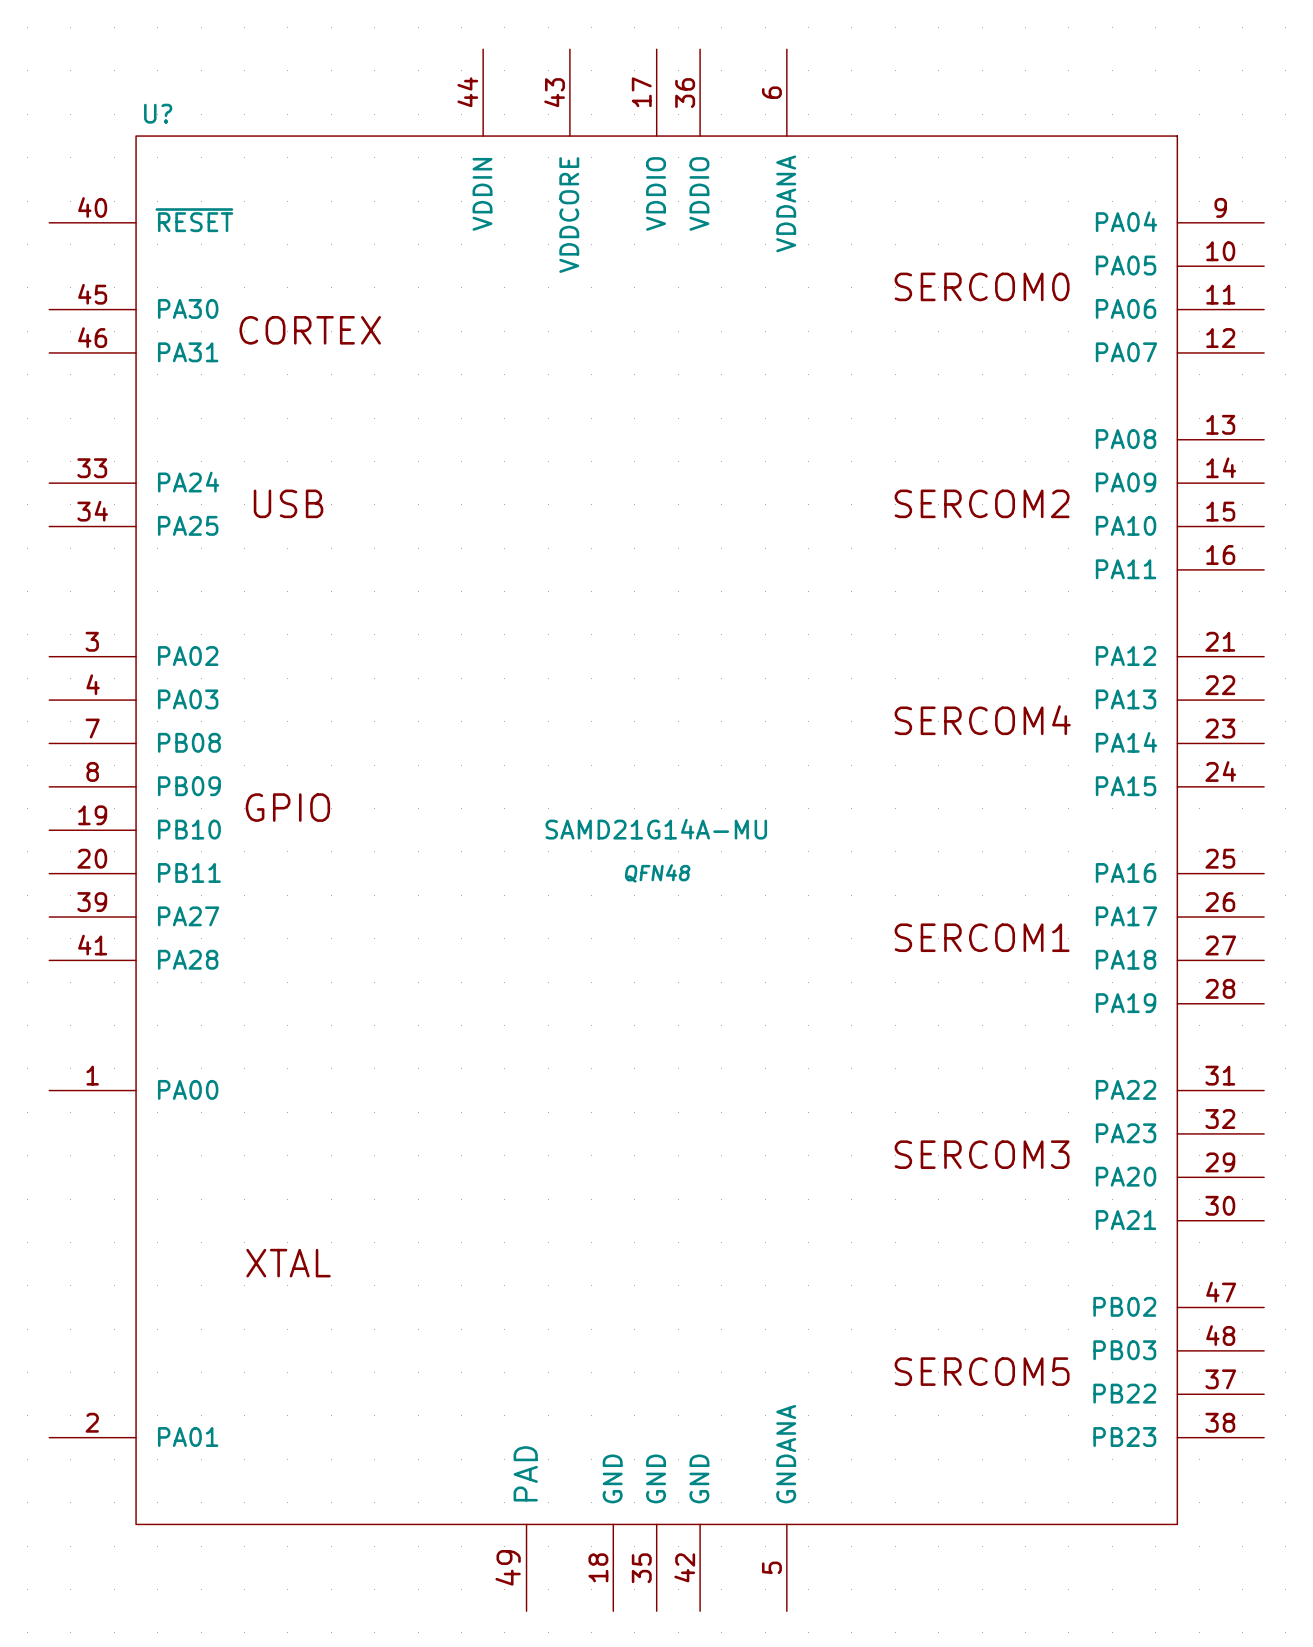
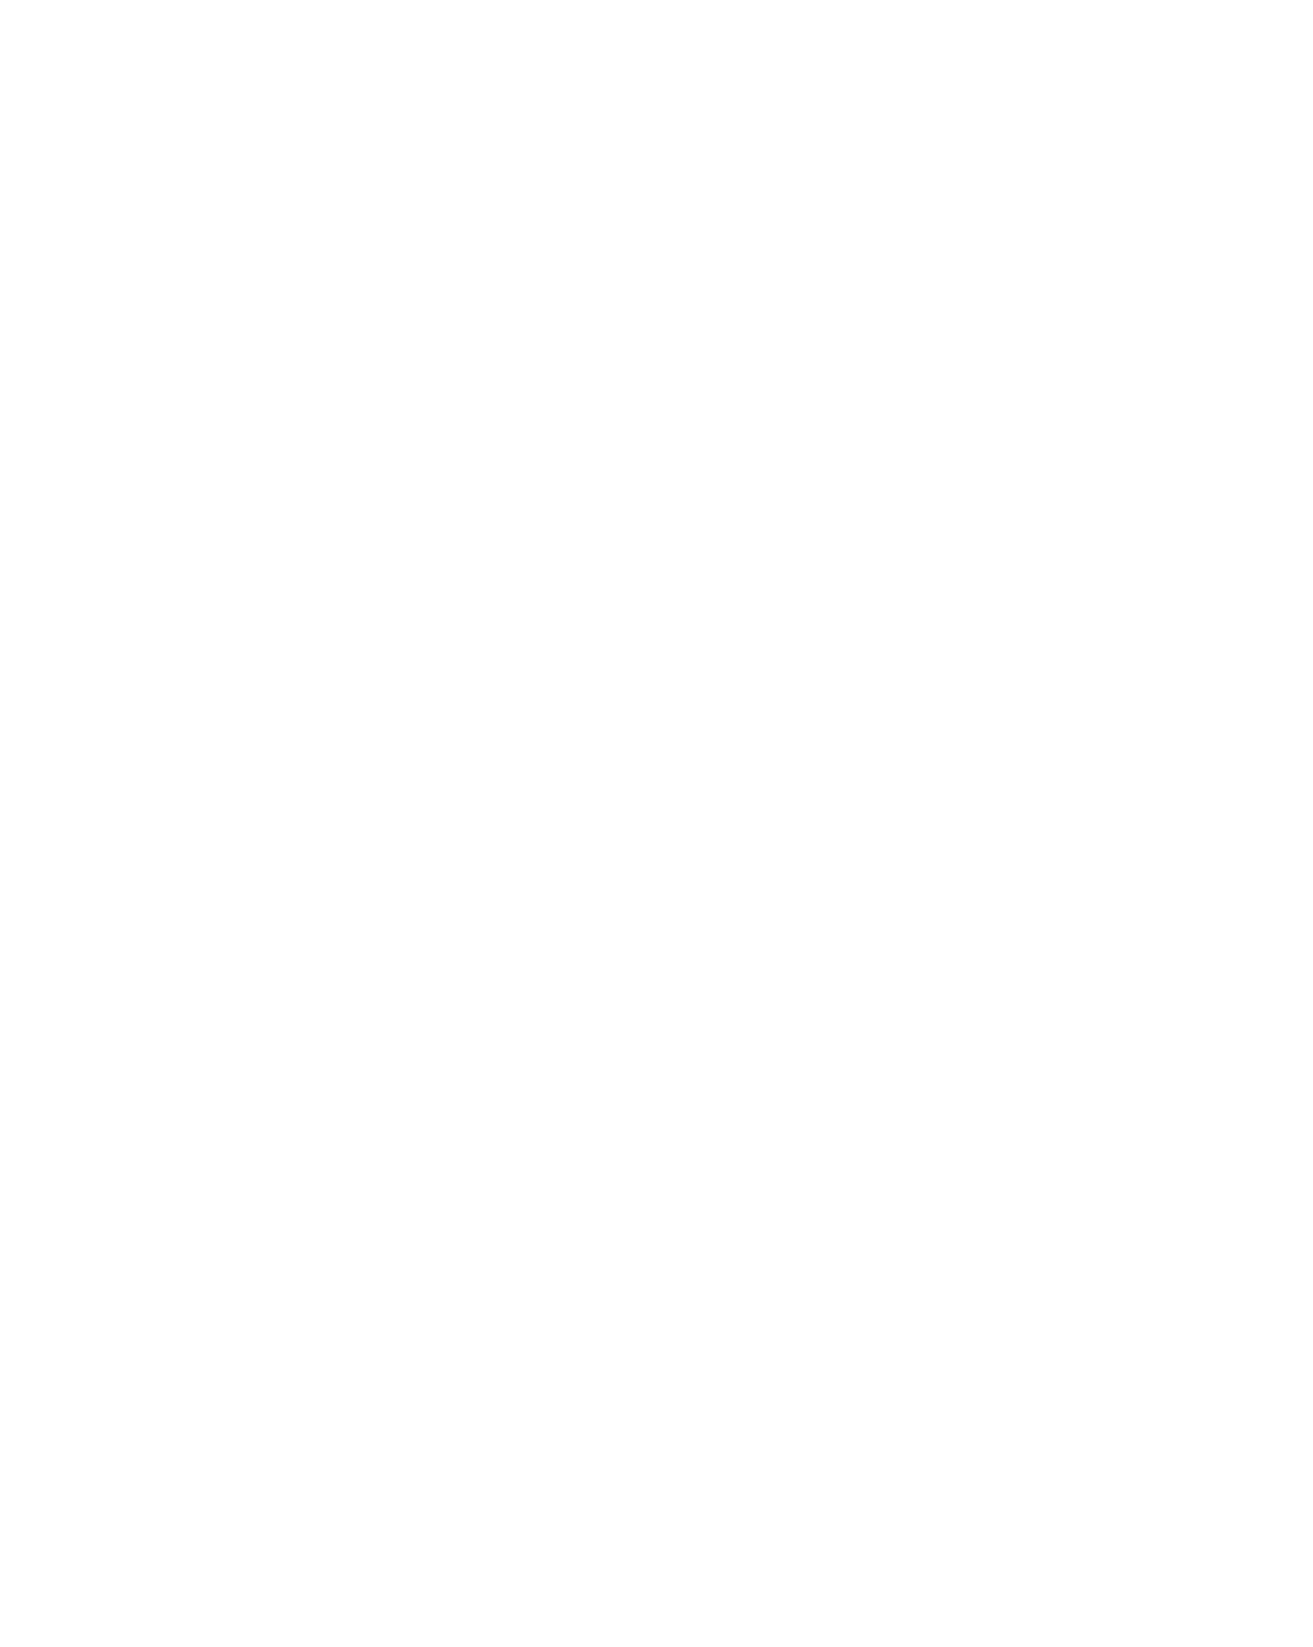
U?: SAMD21G14A-MU (656, 830) -> none

